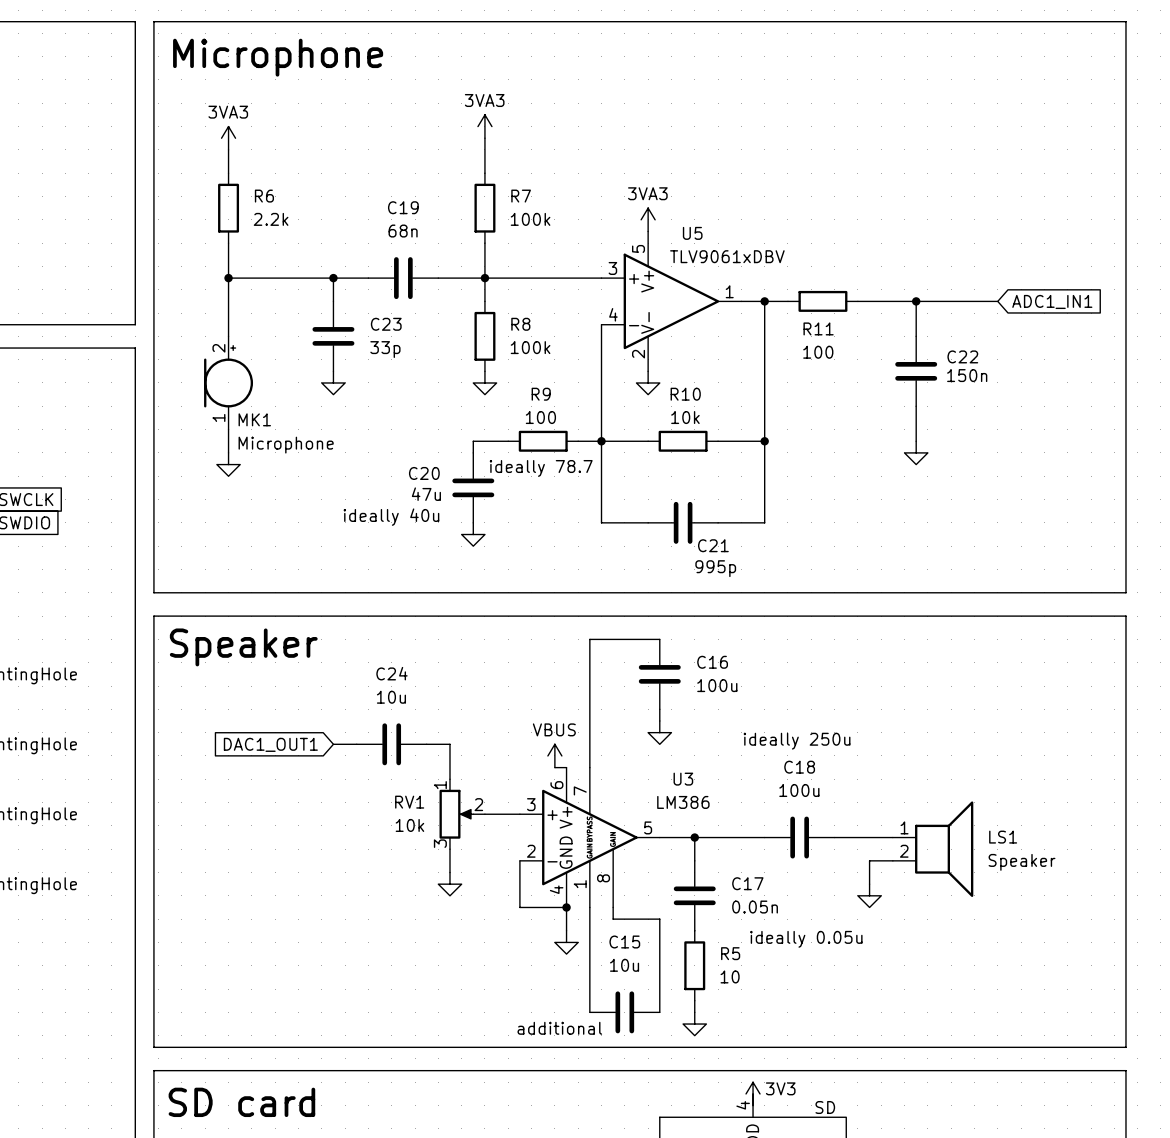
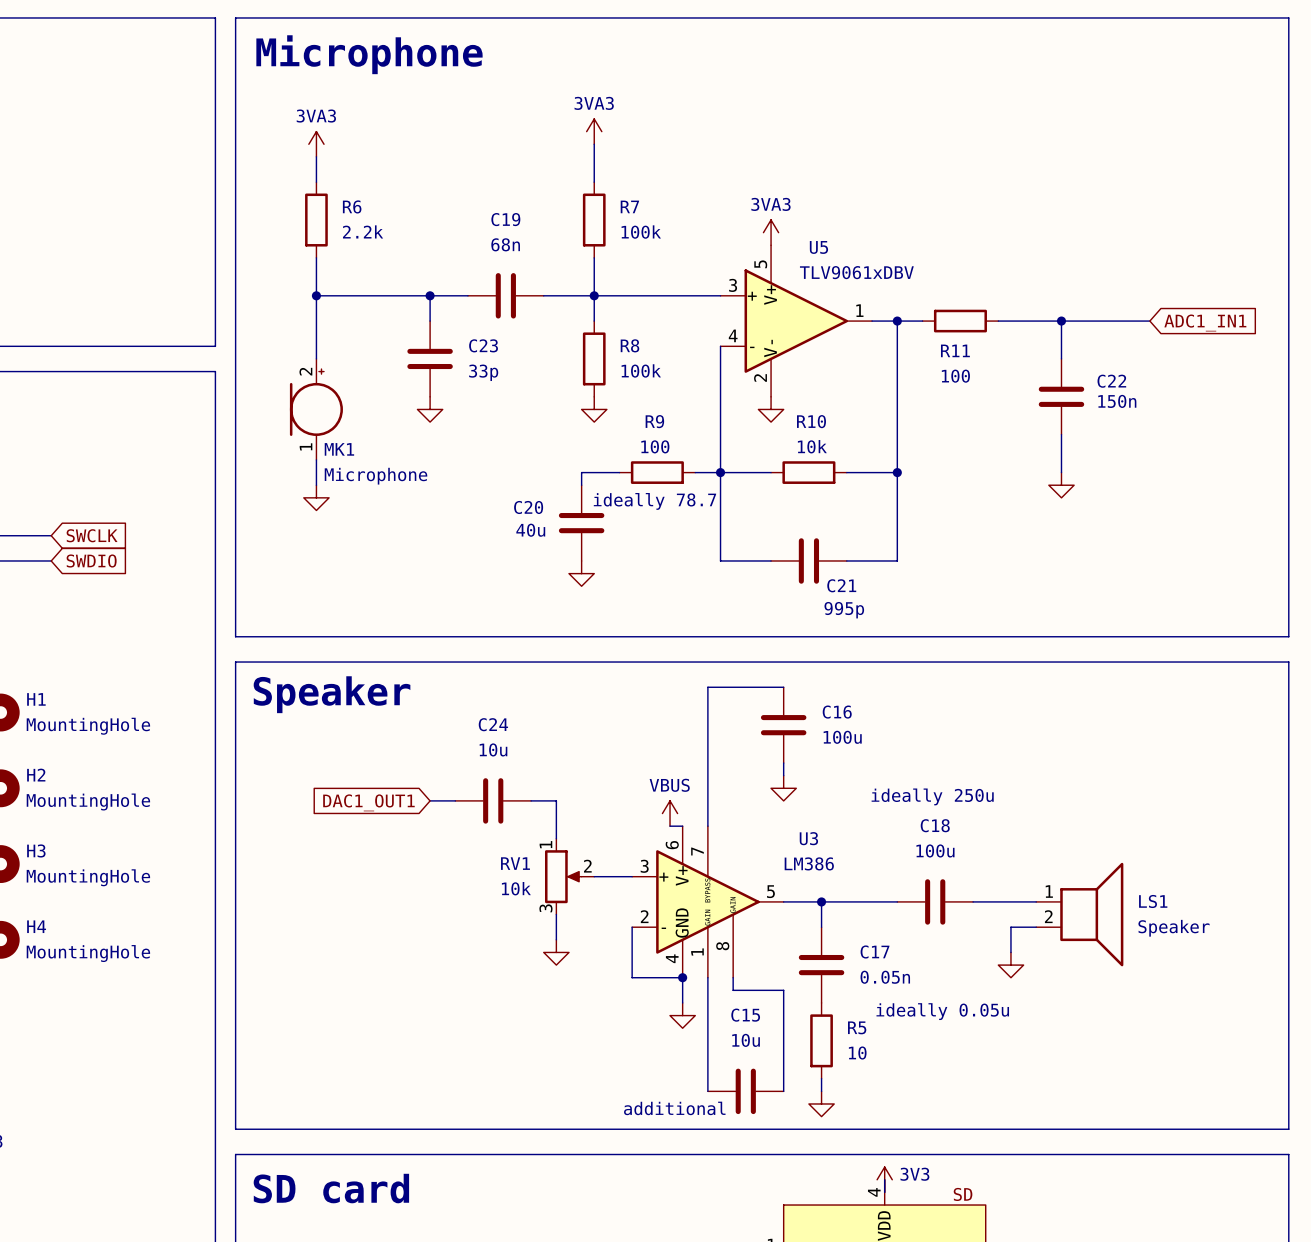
C20 value: 47u (426, 494) -> 40u (530, 530)
text: ideally 40u (391, 517) -> none

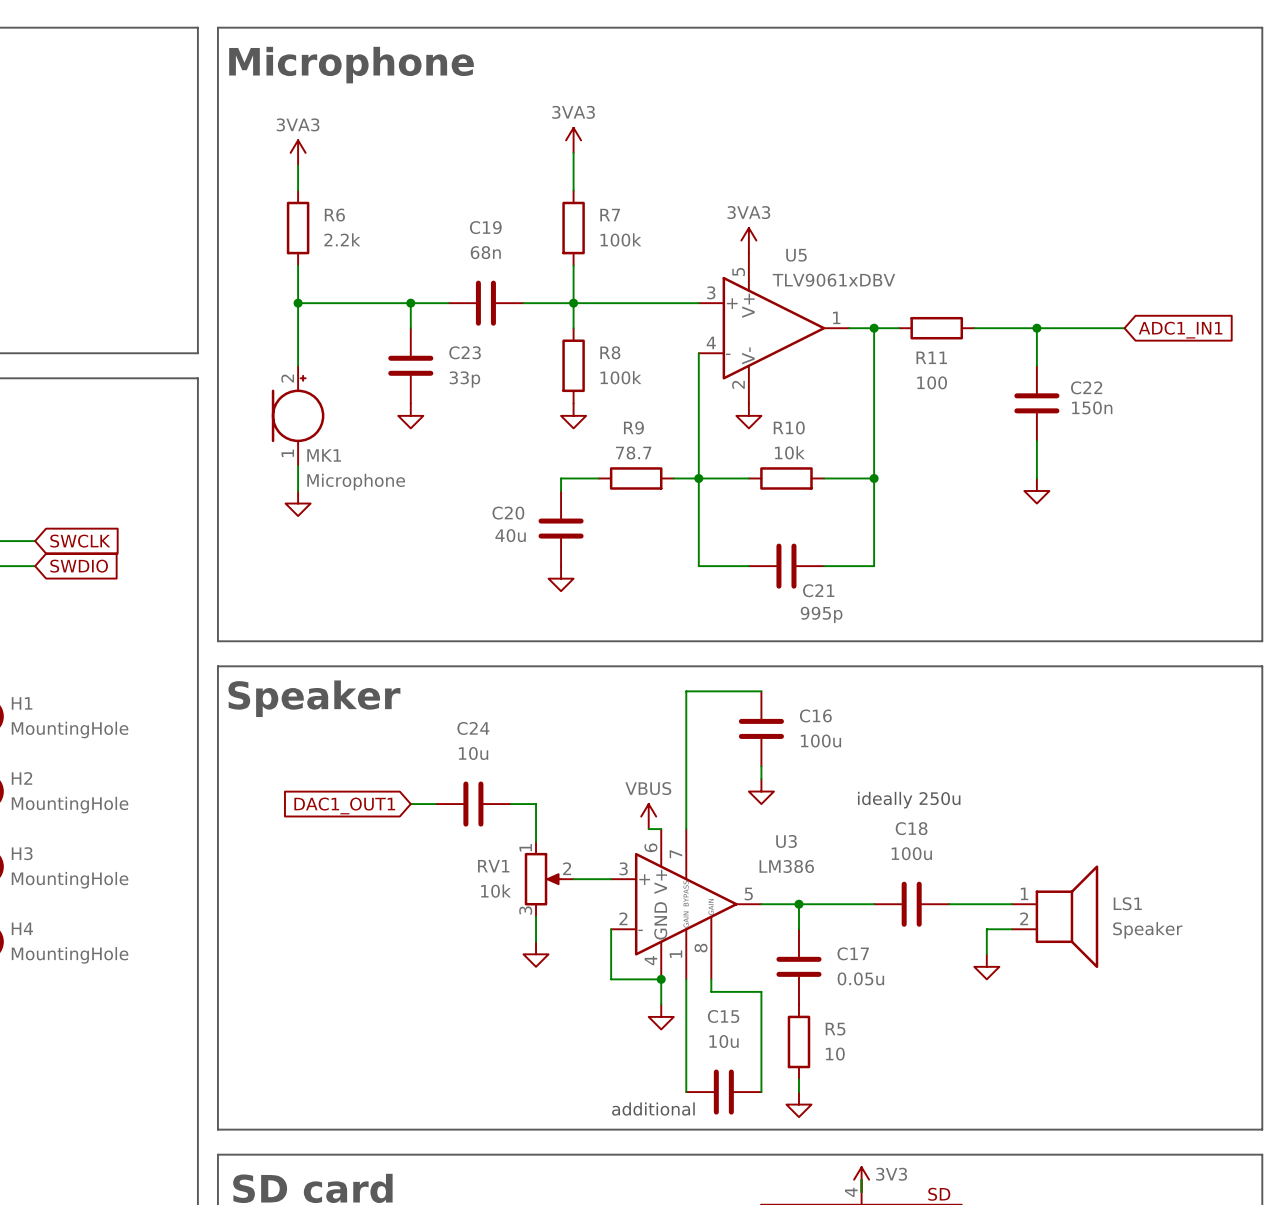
R9 value: 100 (655, 446) -> 78.7 (633, 452)
text: ideally 78.7 (654, 501) -> none
C17 value: 0.05n (885, 977) -> 0.05u (860, 978)
text: ideally 0.05u (942, 1011) -> none

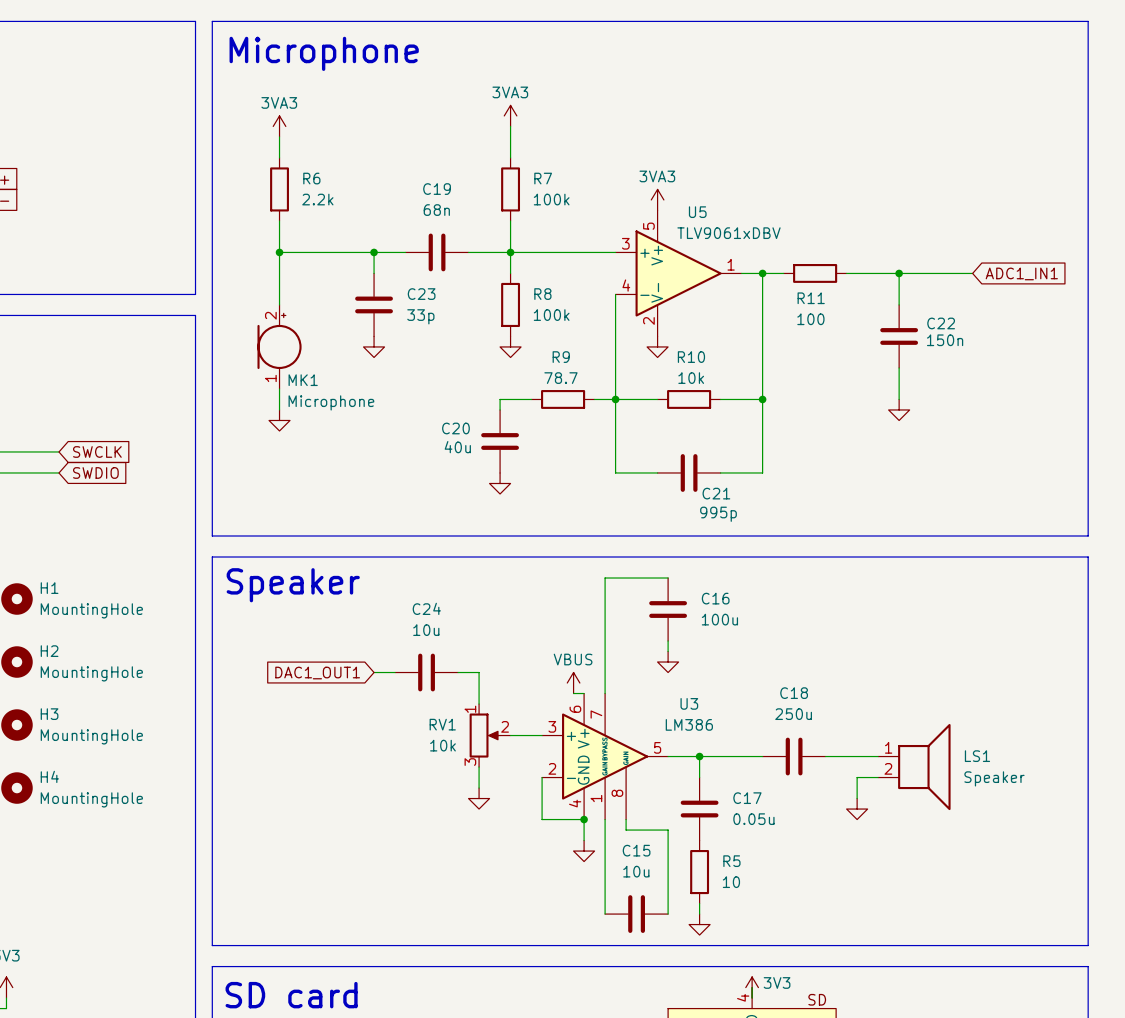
text: ideally 250u (909, 800) -> none
C18 value: 100u (911, 853) -> 250u (793, 714)
text: additional (653, 1109) -> none

